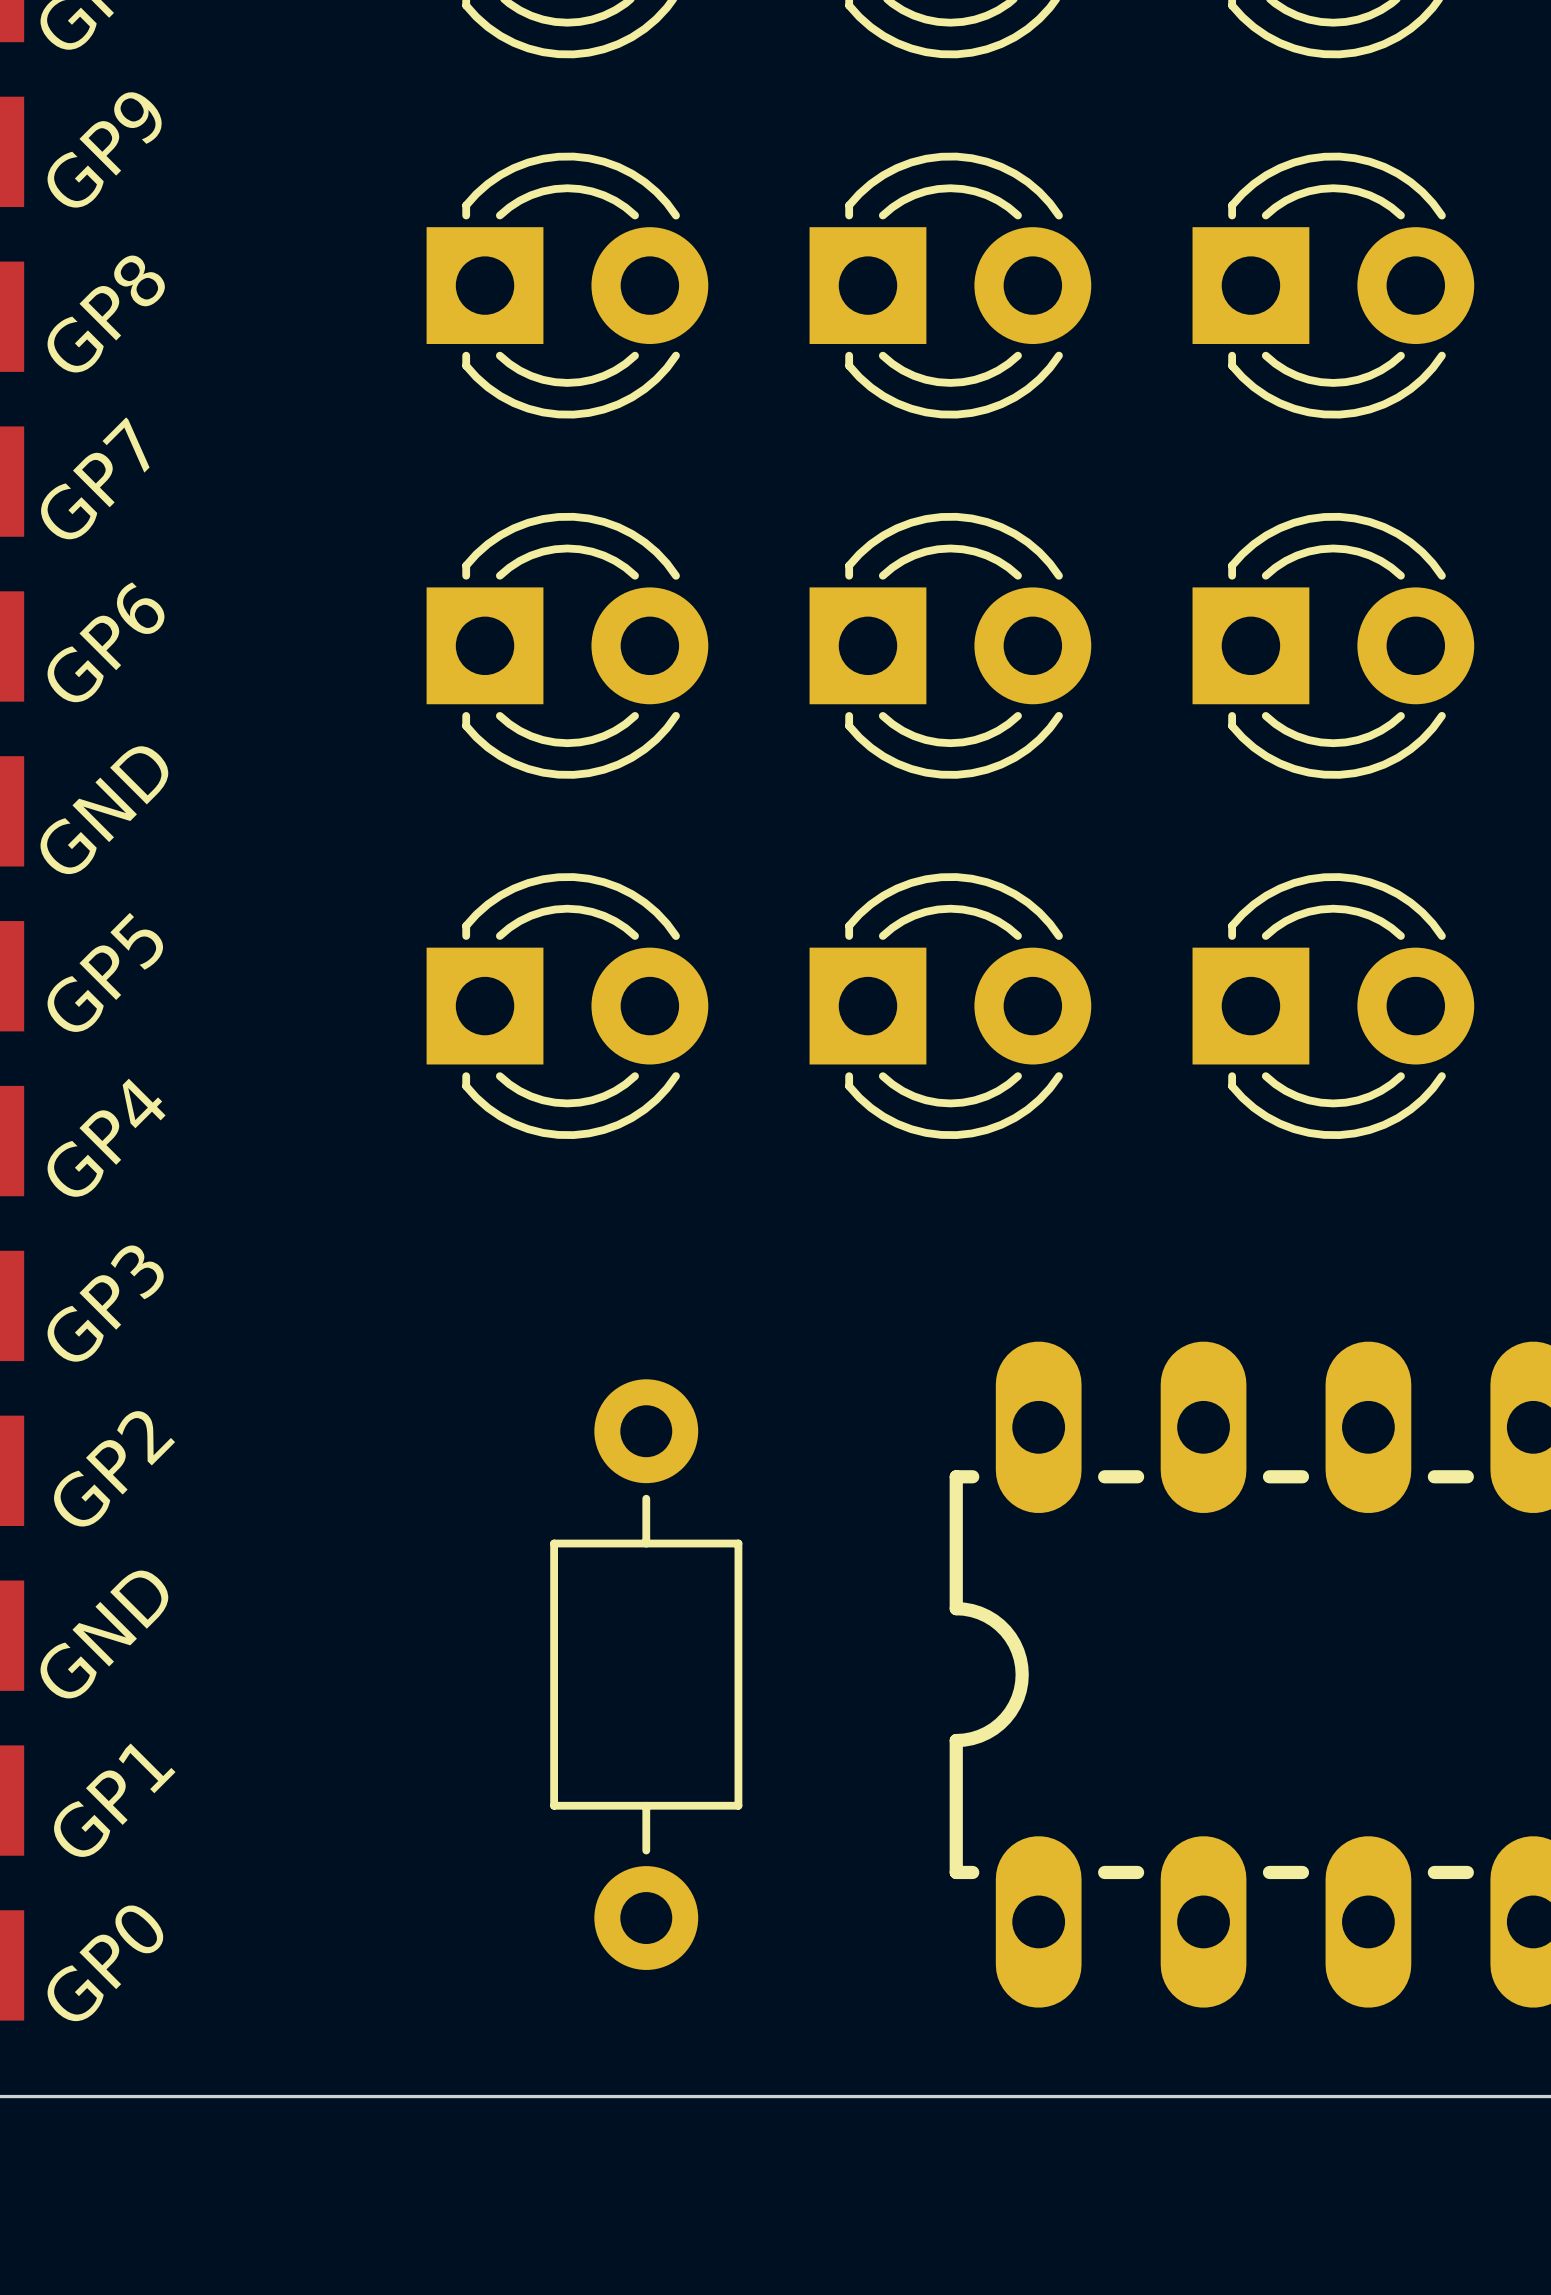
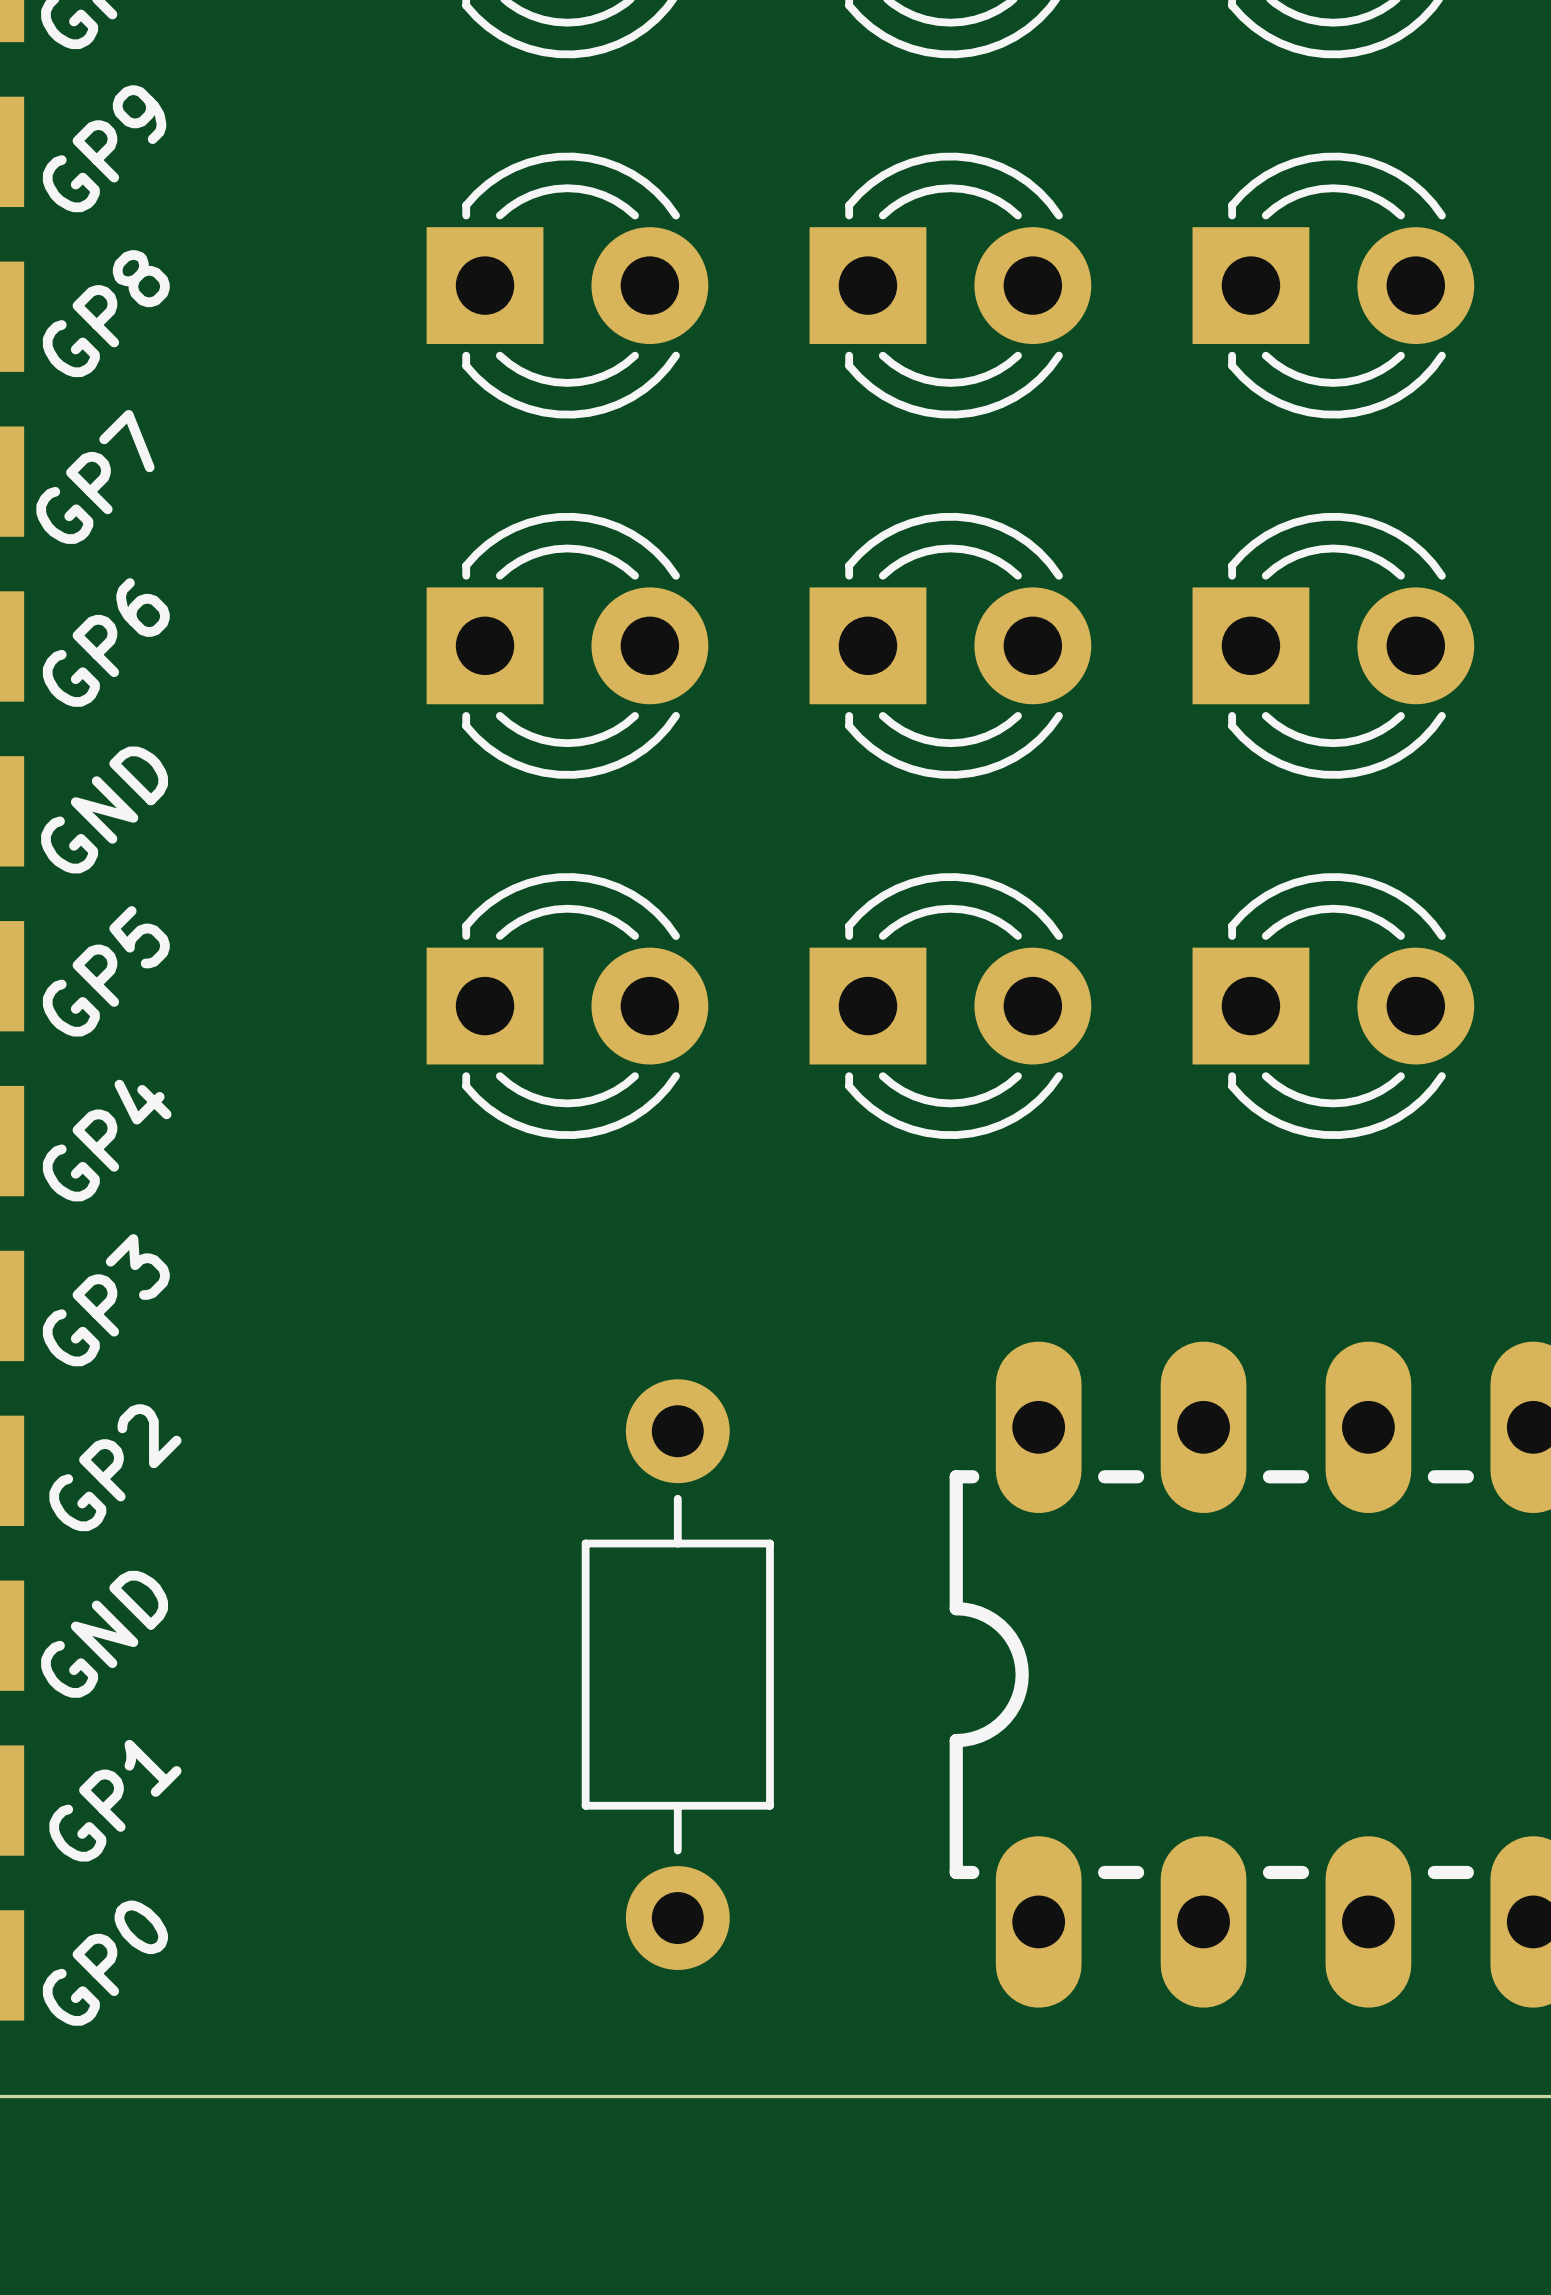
part position: (646, 1674) -> (677, 1674)

